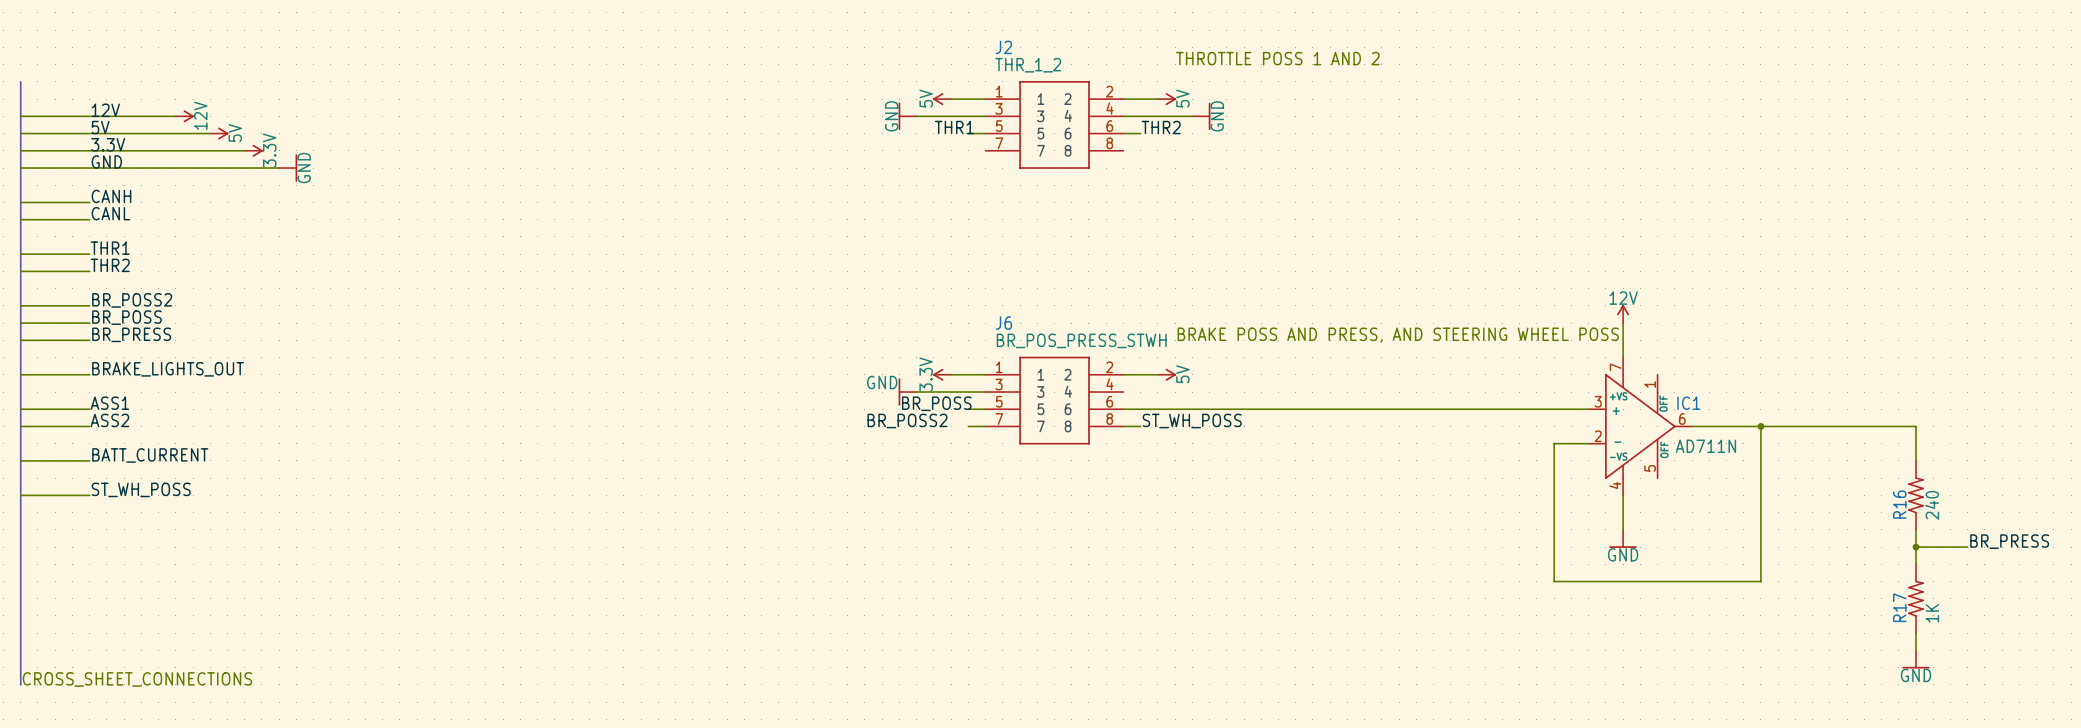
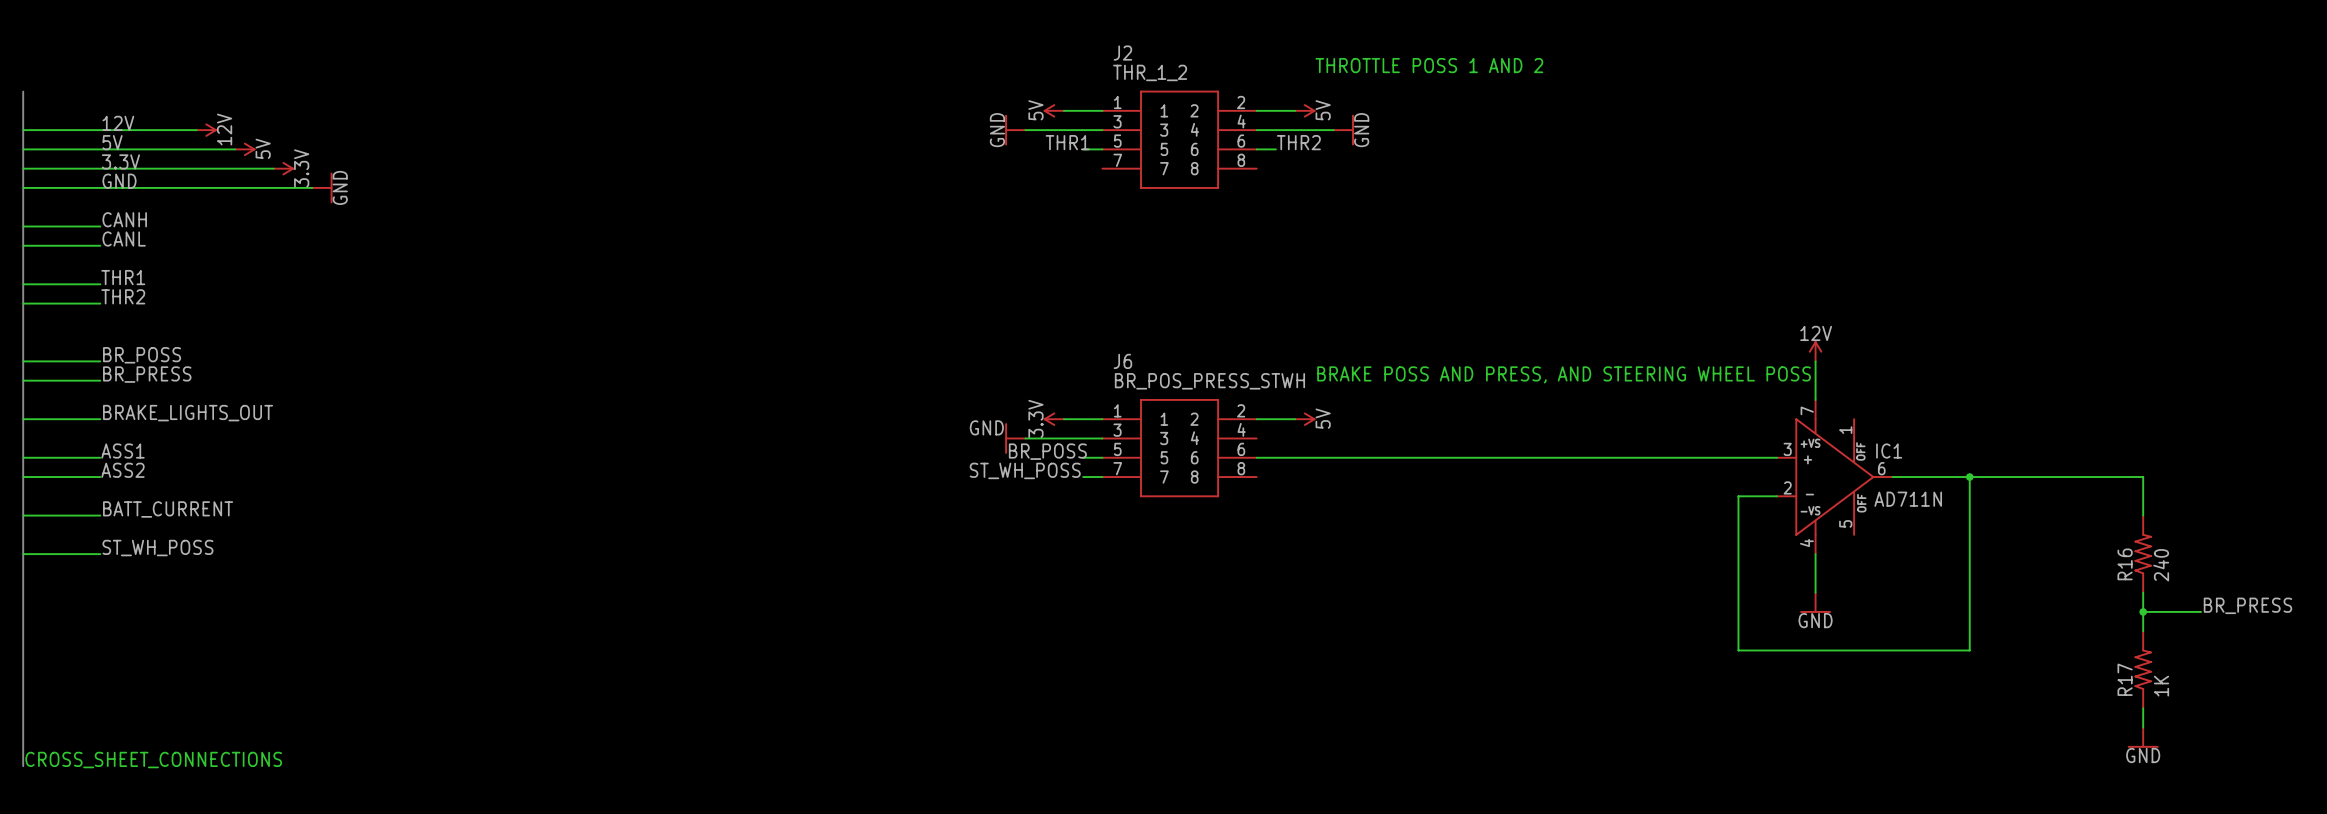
label: BR_POSS2 (132, 300) -> none
wire: (20, 305) (89, 305) -> none
label: BR_POSS2 (907, 421) -> ST_WH_POSS (1025, 470)
label: ST_WH_POSS (1192, 421) -> none
wire: (1123, 426) (1140, 426) -> none

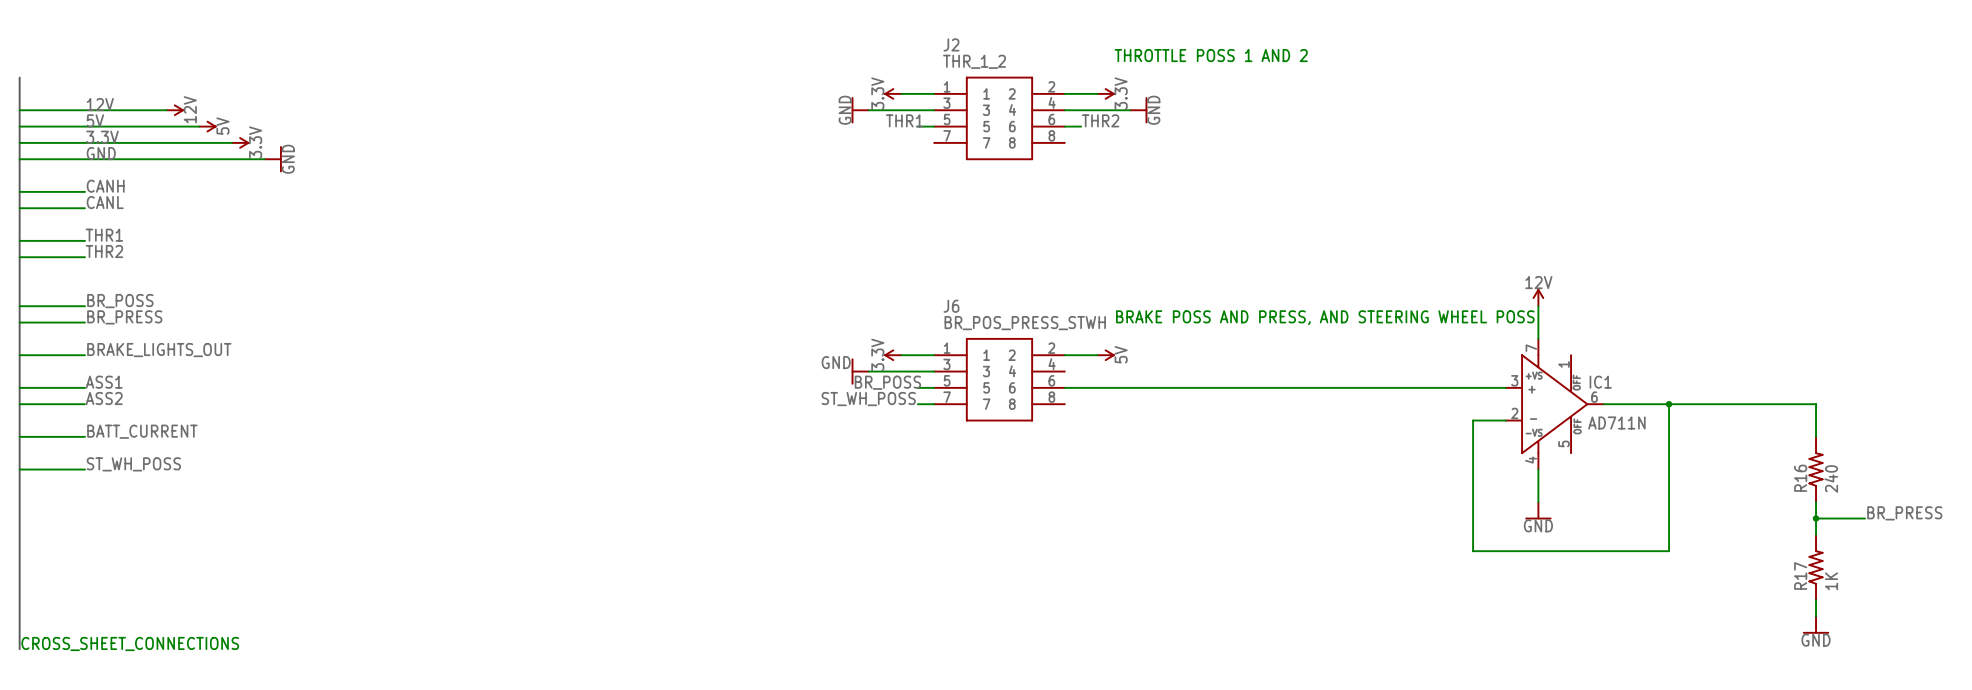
power symbol: 5V (1053, 110) -> 3.3V (892, 93)
power symbol: 5V (1305, 110) -> 3.3V (1106, 93)

